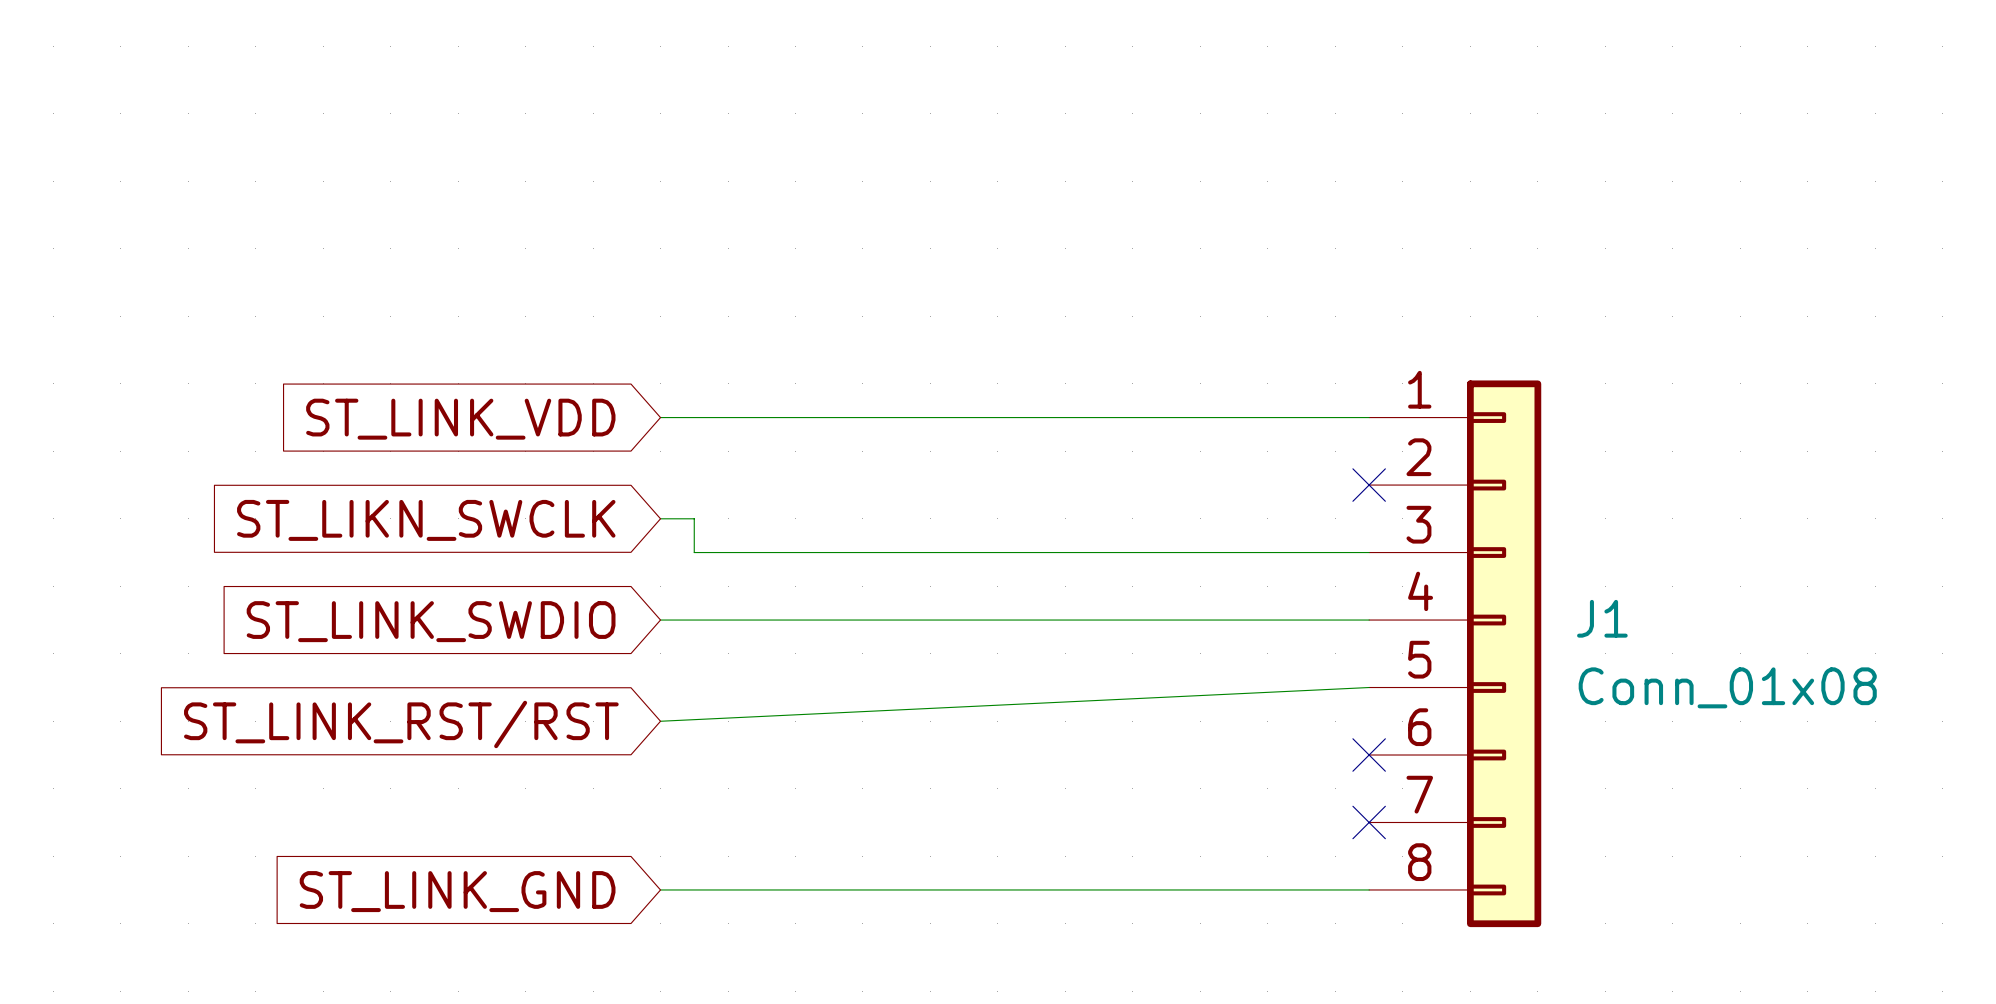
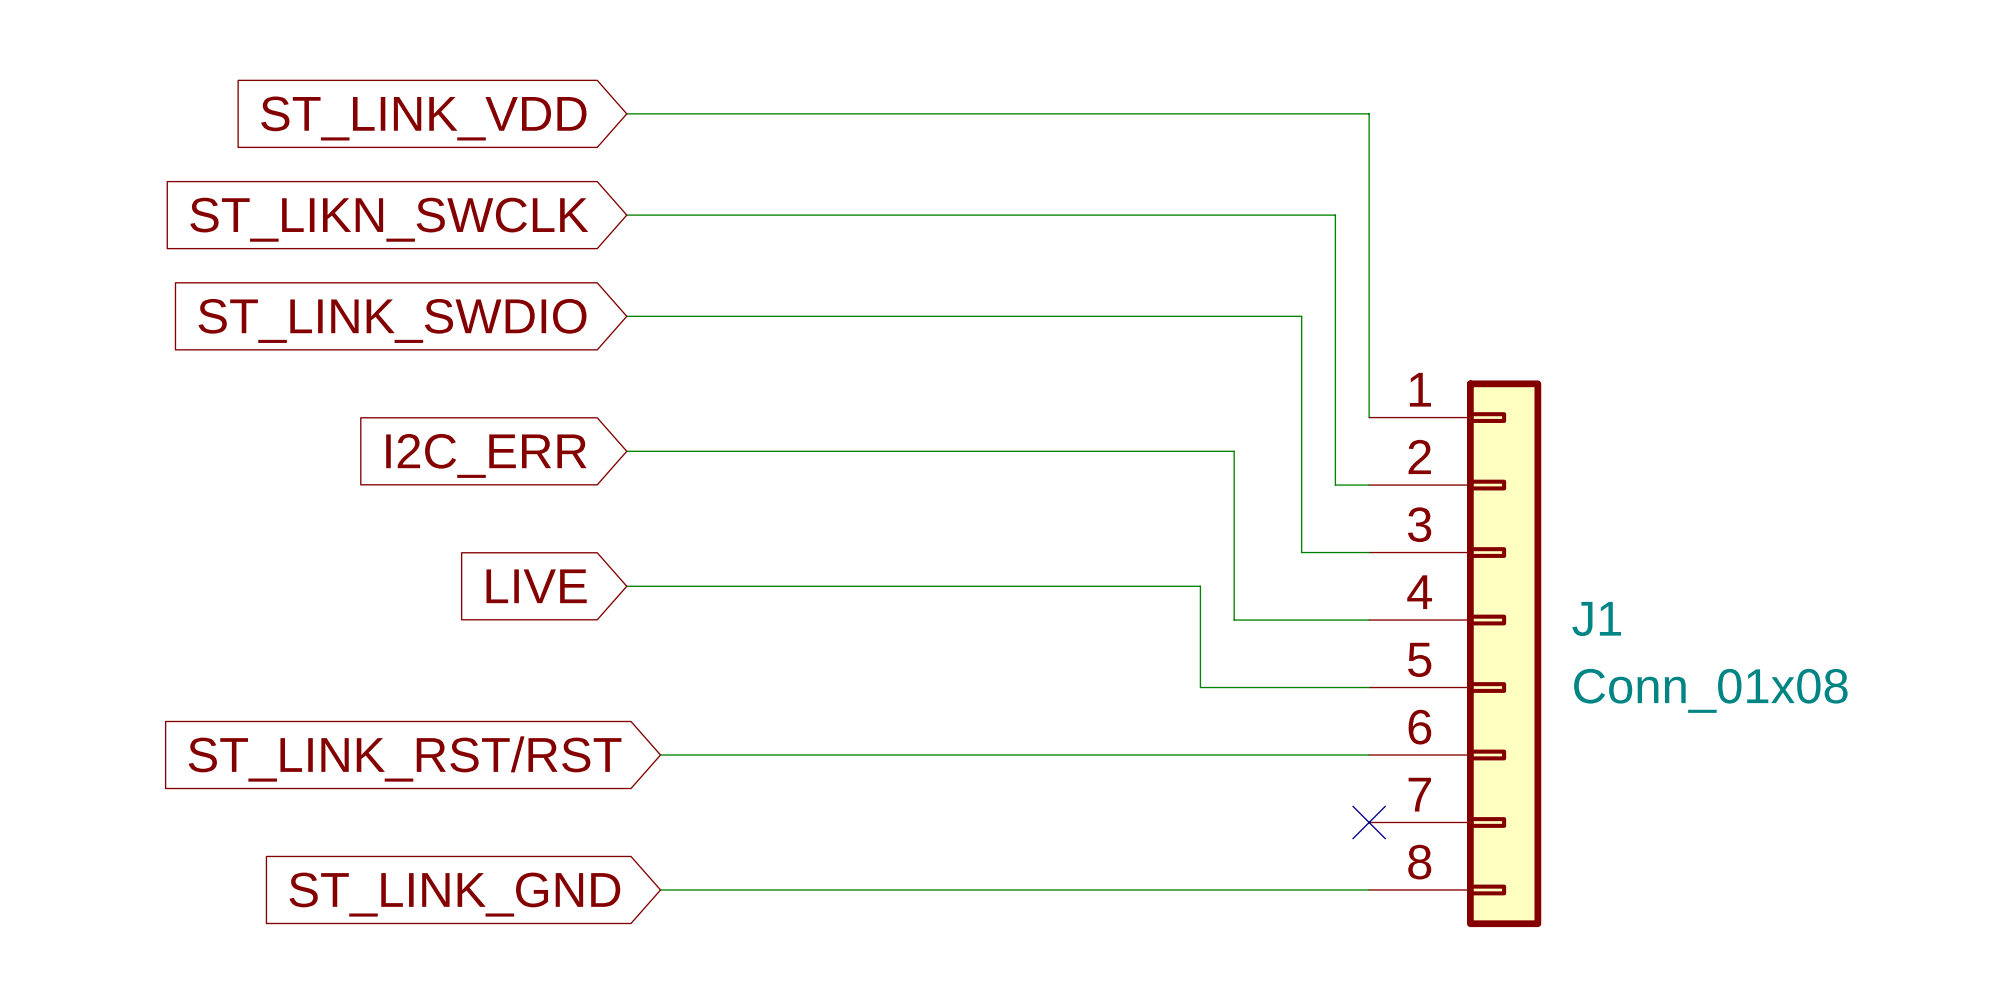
wire: none -> (626, 215) (1335, 215) (1335, 485) (1369, 485)
wire: (660, 417) (1369, 417) -> (626, 113) (1369, 113) (1369, 417)
global label position: ST_LINK_VDD (460, 419) -> ST_LINK_VDD (423, 118)
global label: none -> I2C_ERR (486, 455)
no-connect mark: (1369, 485) -> none
wire: (660, 518) (694, 518) (694, 552) (1301, 552) -> (626, 316) (1301, 316) (1301, 552)
global label position: ST_LIKN_SWCLK (426, 520) -> ST_LIKN_SWCLK (389, 219)
global label: none -> LIVE (536, 586)
wire: (660, 620) (1234, 620) -> (626, 451) (1234, 451) (1234, 620)
global label position: ST_LINK_SWDIO (431, 621) -> ST_LINK_SWDIO (392, 320)
wire: (1369, 687) (660, 721) -> (1369, 687) (1200, 687) (1200, 586) (626, 586)
global label position: ST_LINK_RST/RST (401, 724) -> ST_LINK_RST/RST (405, 758)
wire: none -> (660, 755) (1369, 755)
no-connect mark: (1369, 755) -> none

